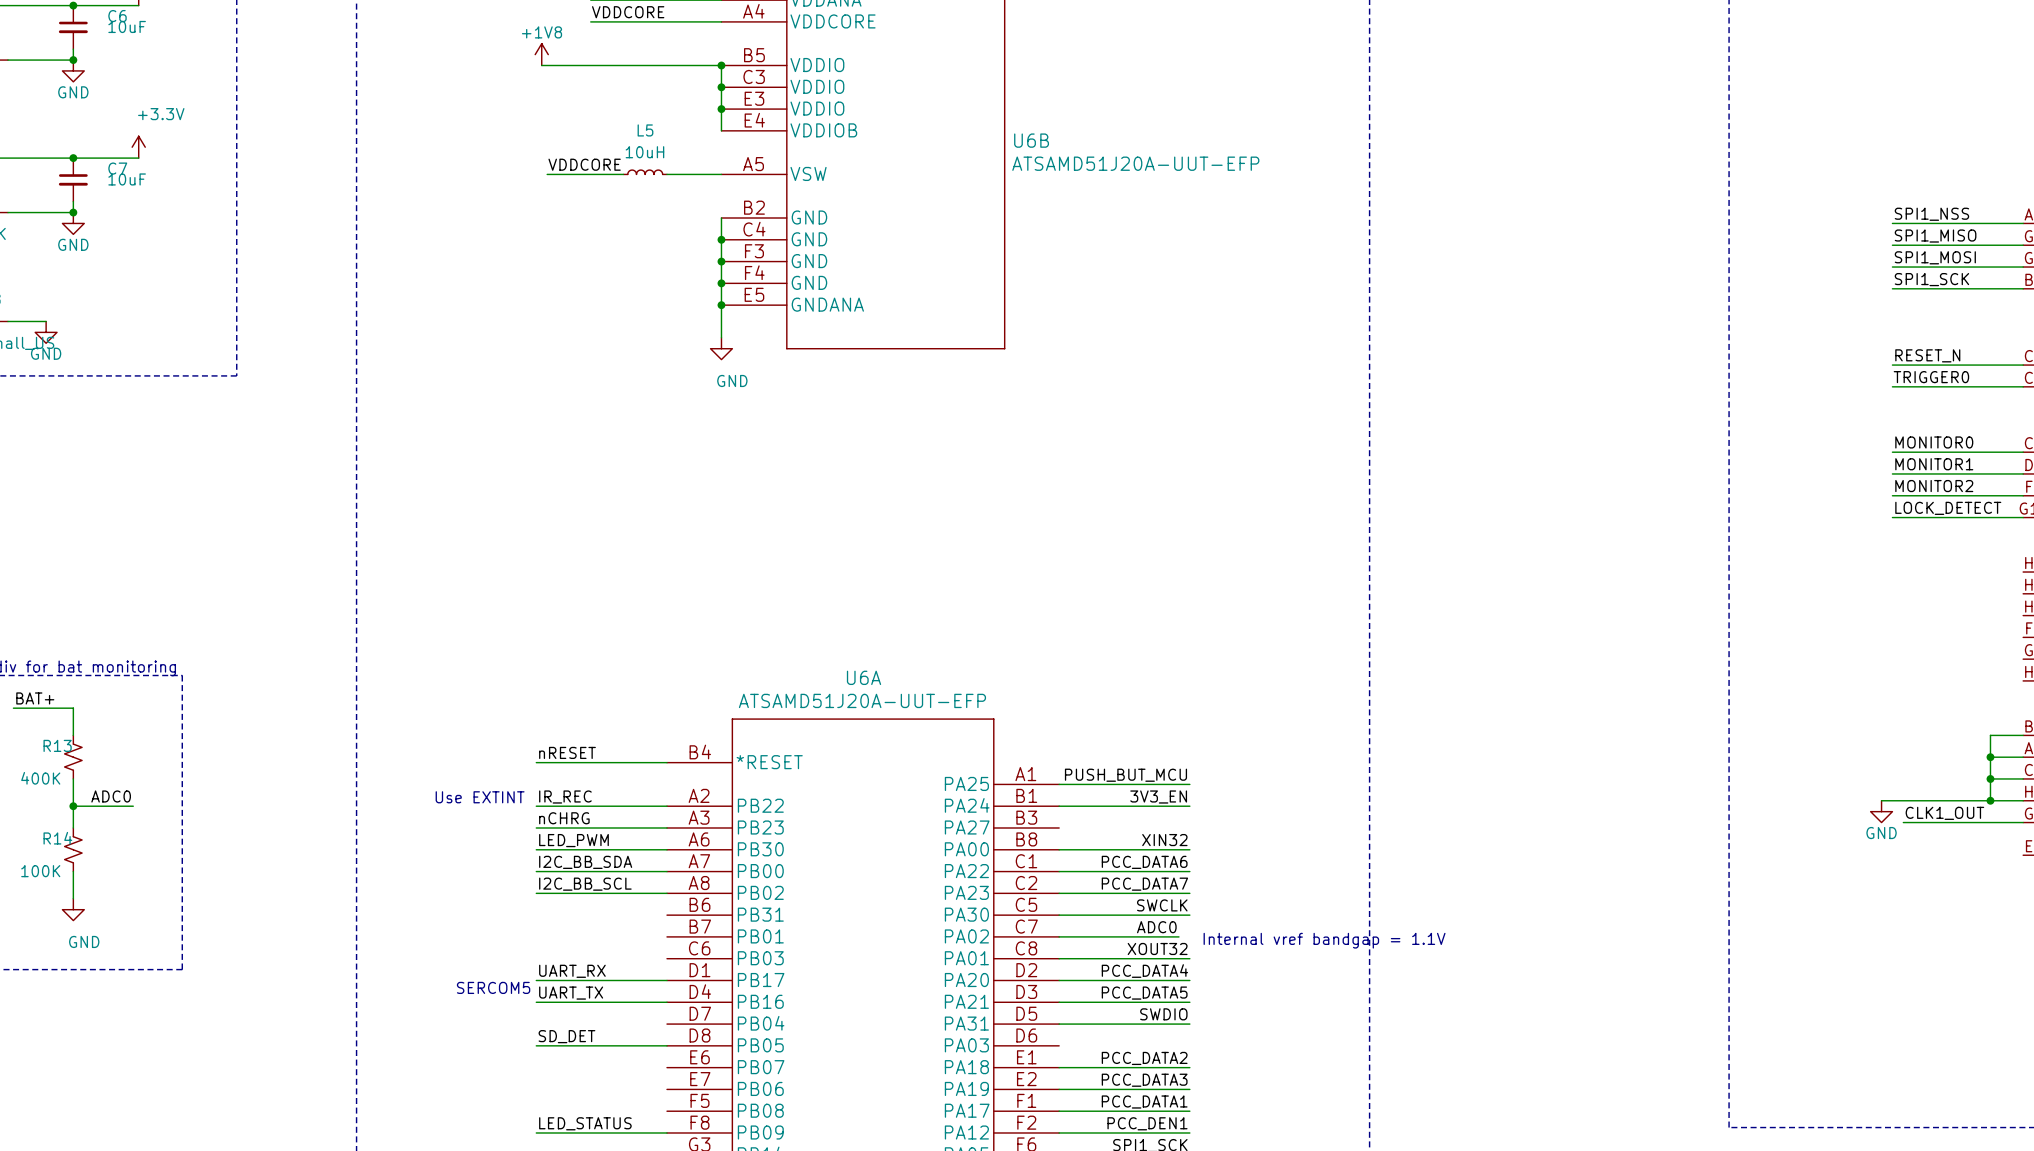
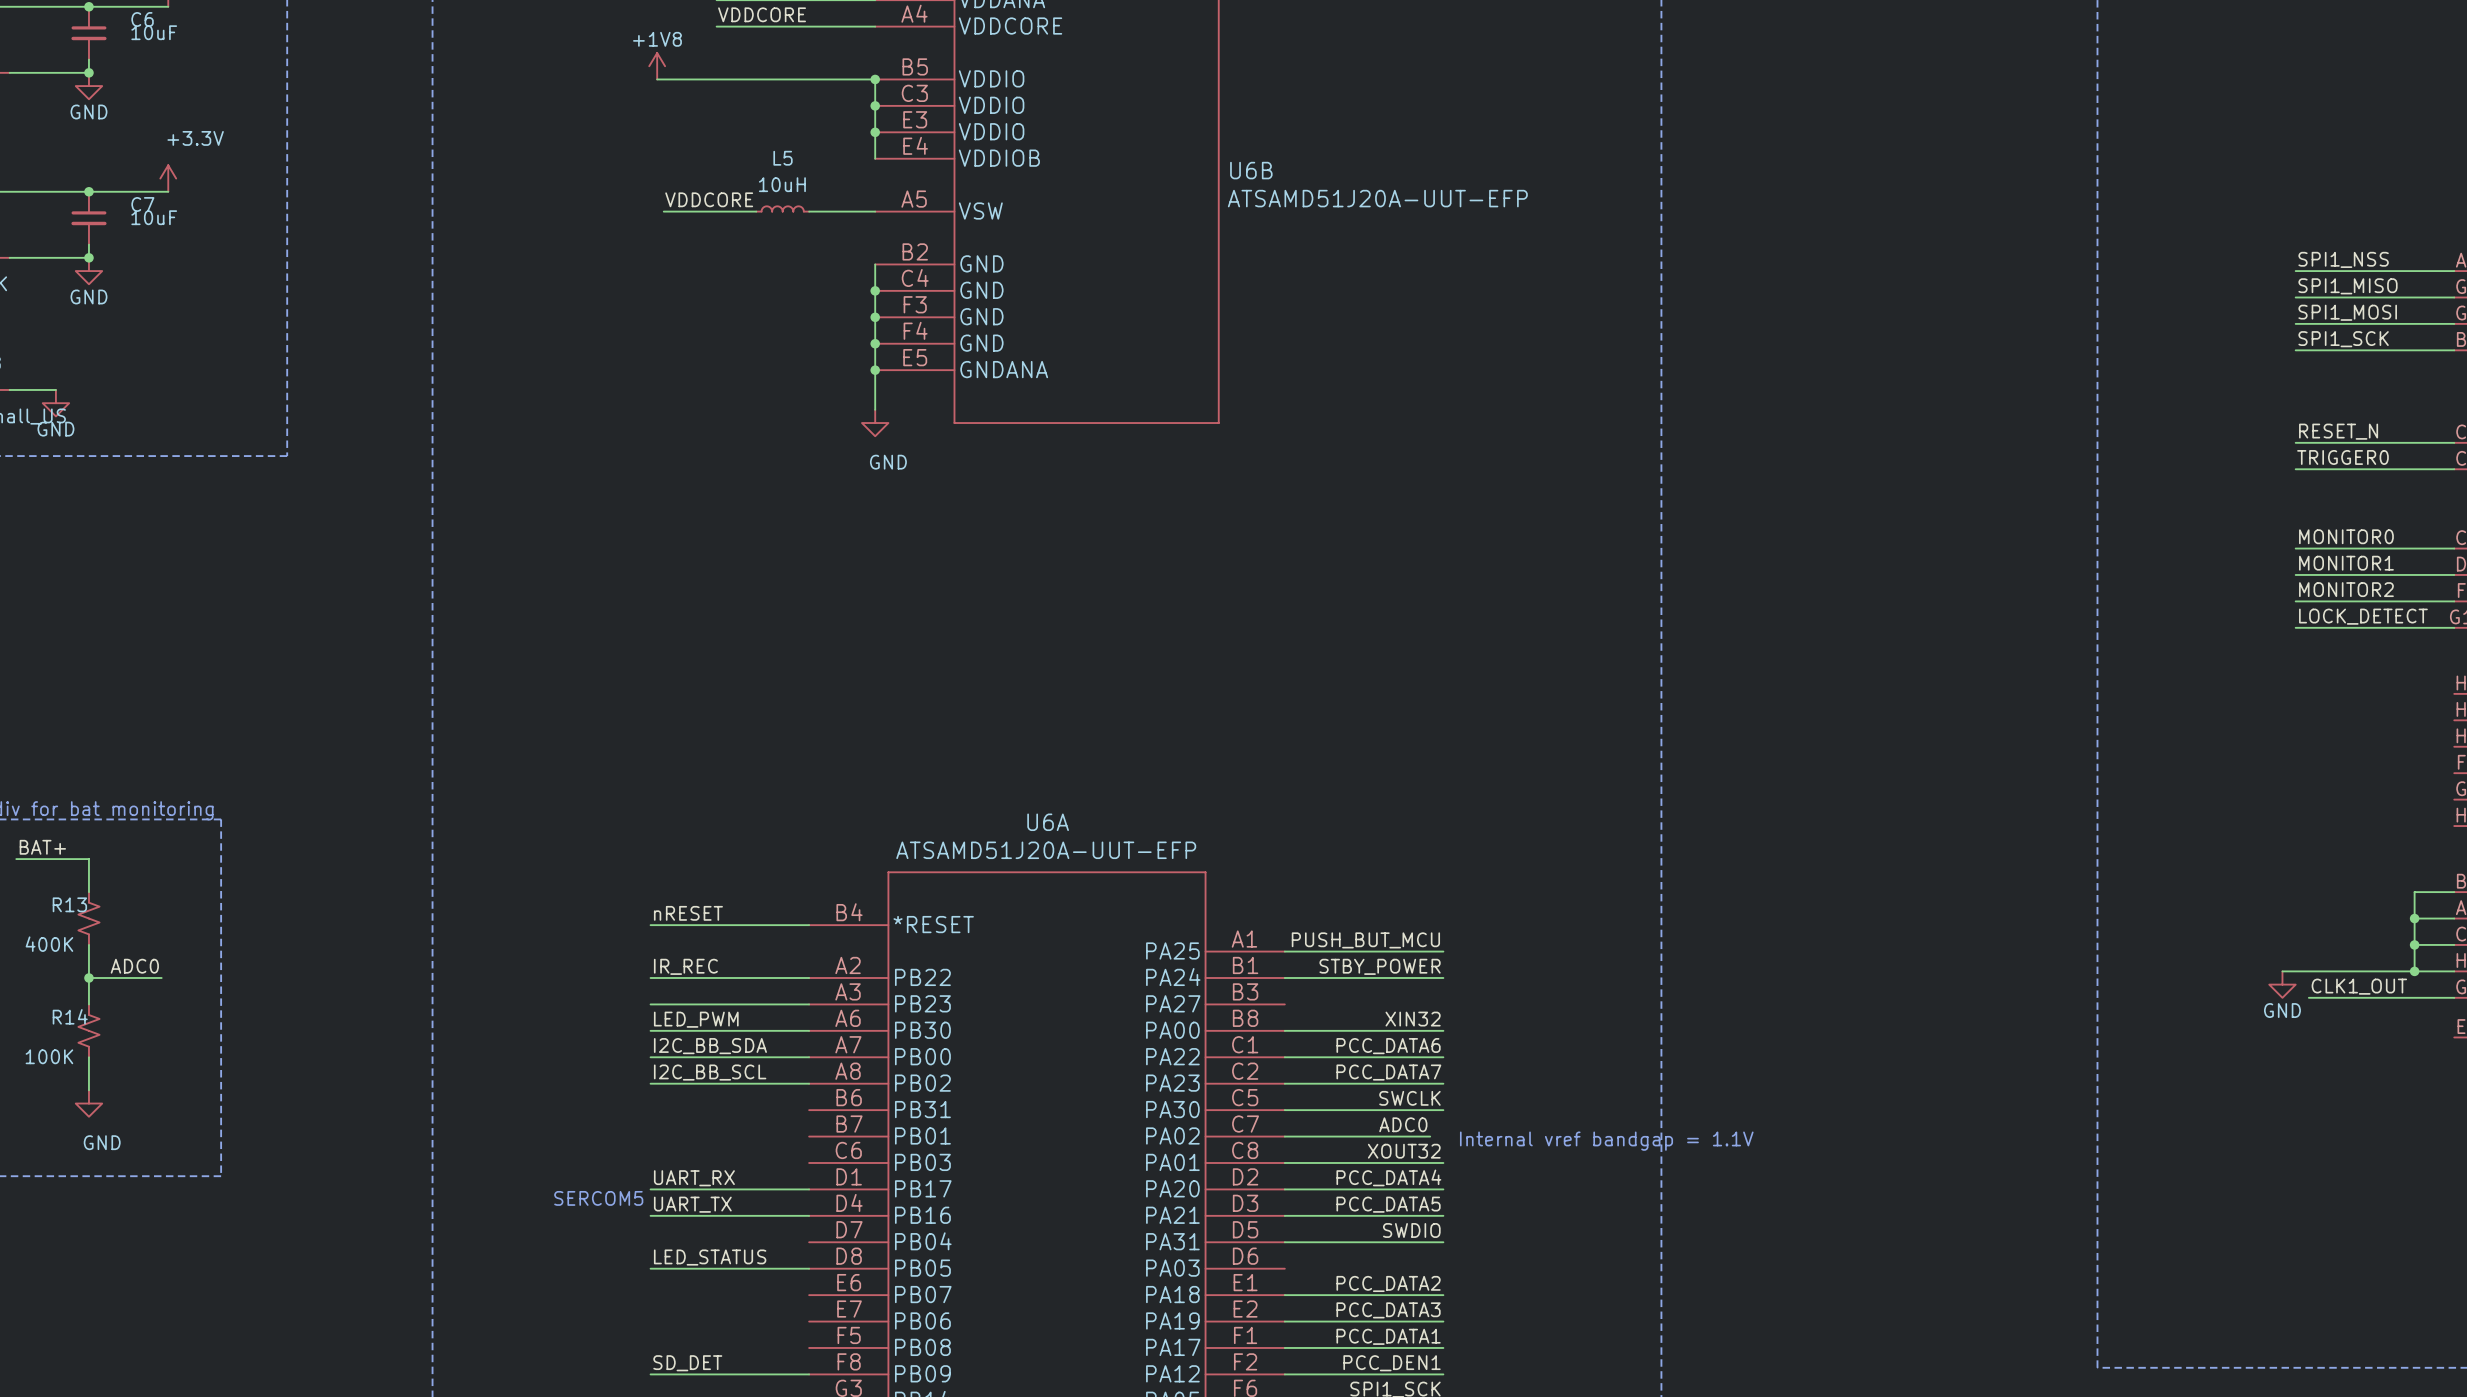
text: Use EXTINT (480, 797) -> none
label: 3V3_EN (1158, 797) -> STBY_POWER (1380, 966)
label: nCHRG (564, 818) -> none
label: SD_DET (566, 1036) -> LED_STATUS (710, 1257)
label: LED_STATUS (585, 1123) -> SD_DET (687, 1363)

